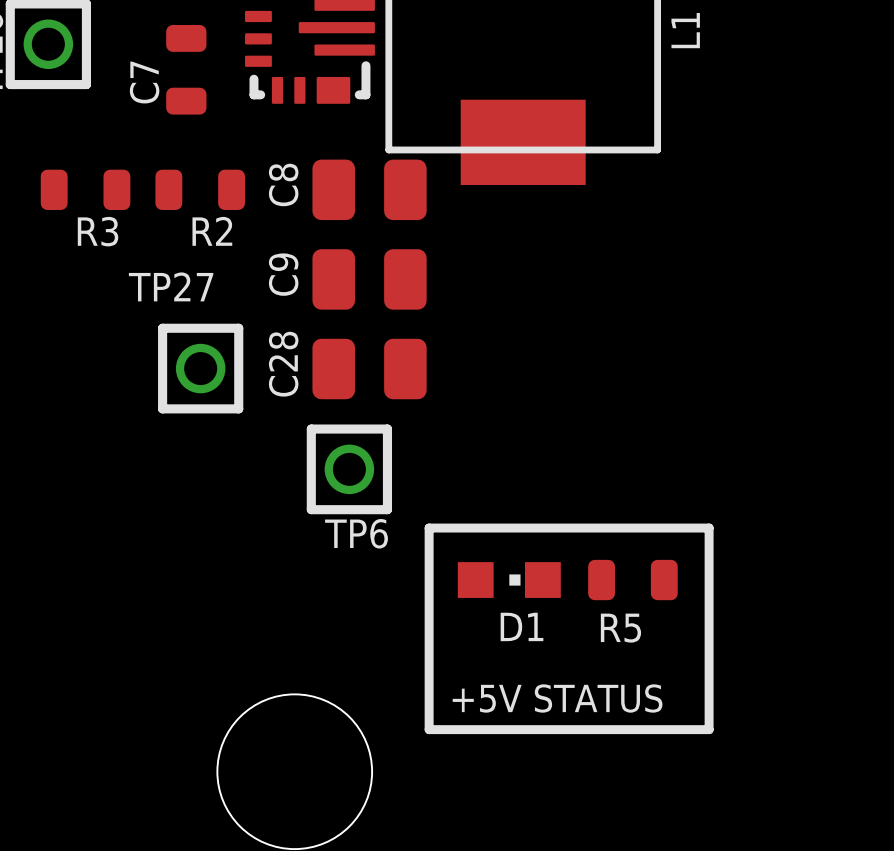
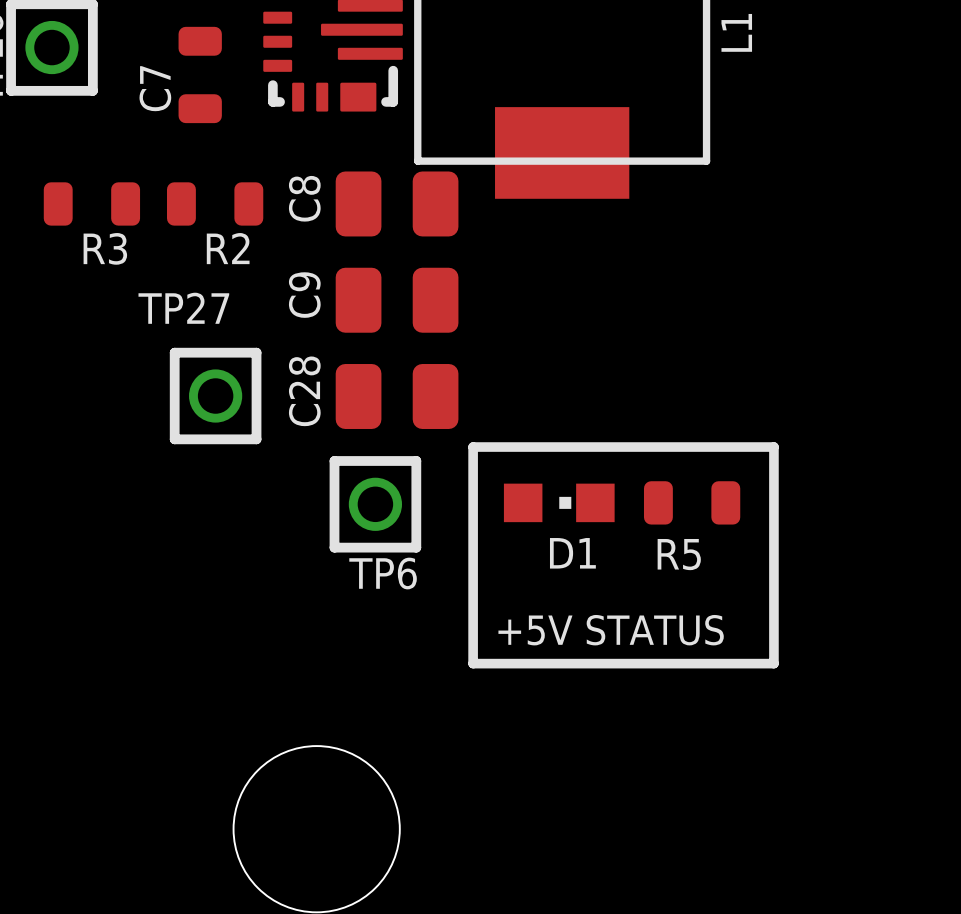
line: (429, 528) (429, 729) (709, 729) (709, 528) (429, 528) -> (473, 447) (473, 663) (773, 663) (773, 447) (473, 447)
D1 position: (509, 580) -> (559, 502)
R5 position: (632, 580) -> (692, 502)
text position: +5V STATUS (557, 698) -> +5V STATUS (611, 630)

